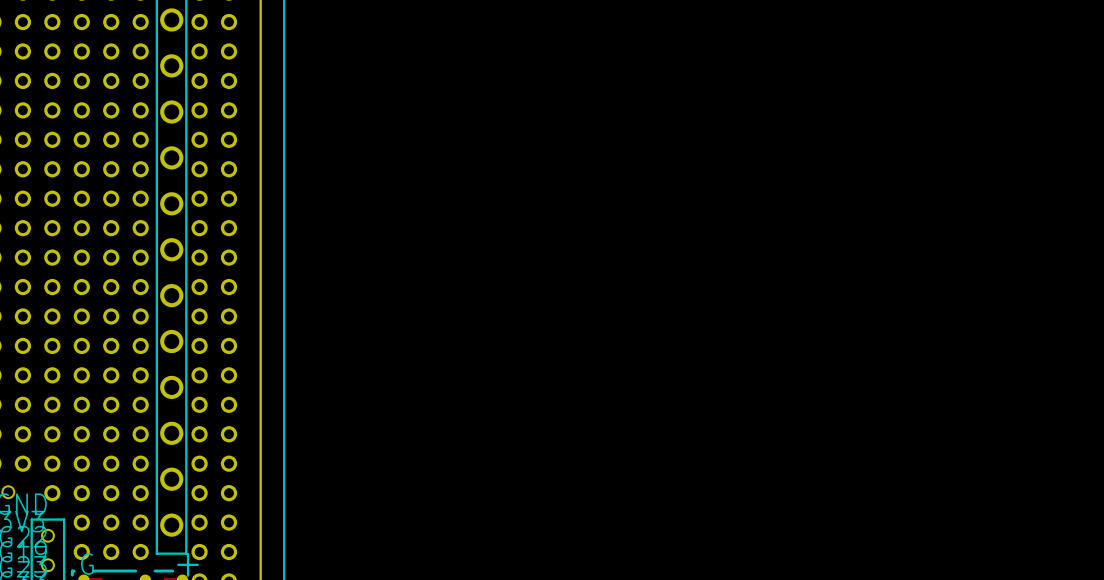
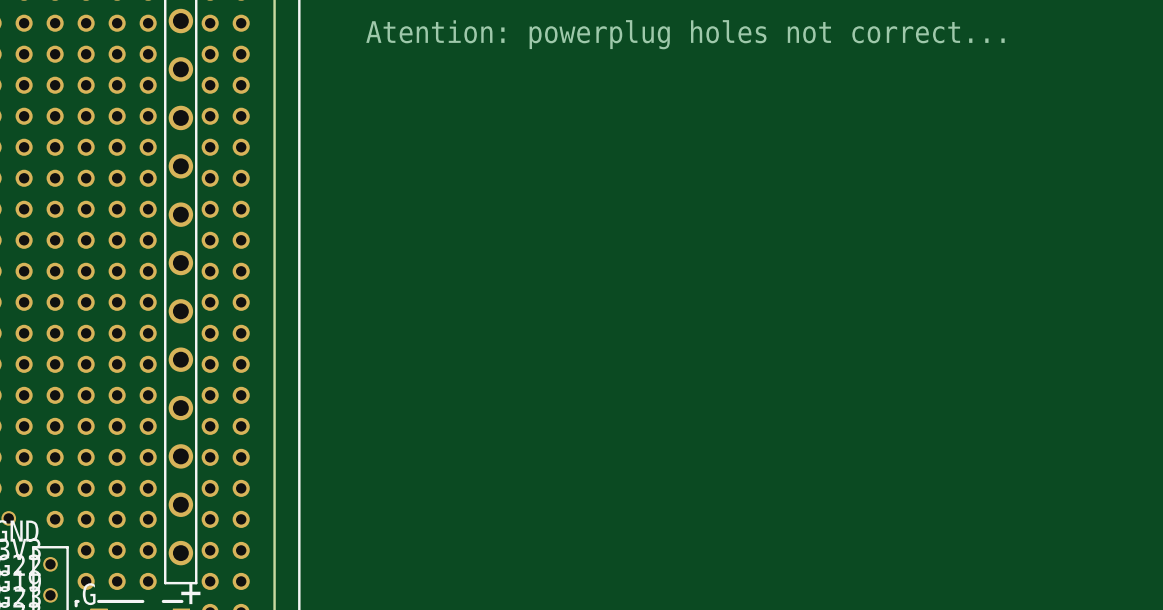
text: none -> Atention: powerplug holes not correct... (685, 34)

